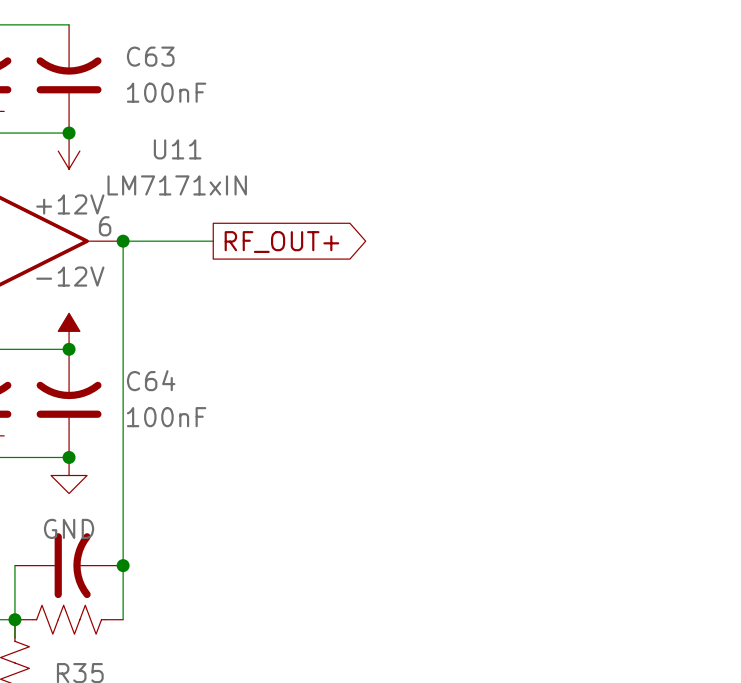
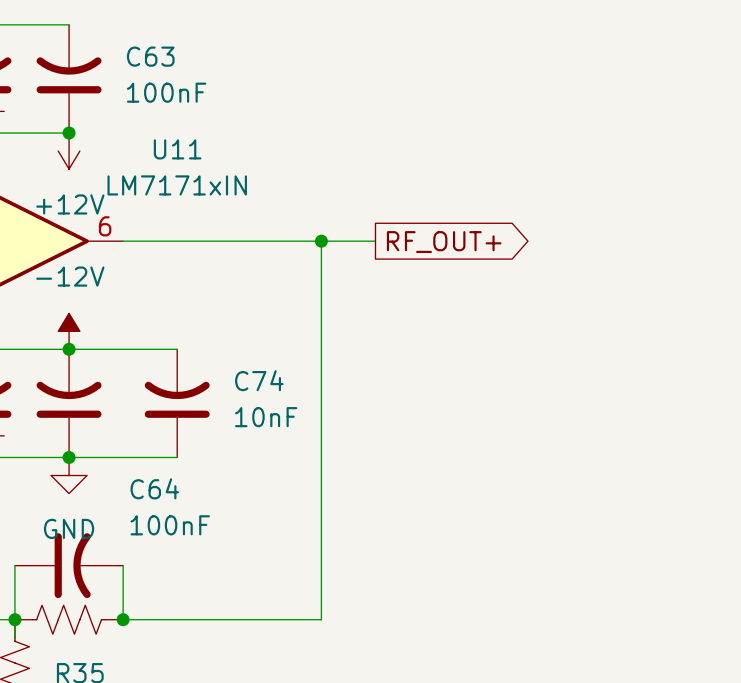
wire: (123, 241) (123, 565) -> none
junction: (123, 241) -> none
wire: none -> (213, 241) (375, 241)
wire: none -> (321, 241) (321, 619) (123, 619)
junction: none -> (321, 241)
global label position: RF_OUT+ (281, 242) -> RF_OUT+ (444, 242)
wire: none -> (69, 349) (177, 349)
C64 name position: C64 (151, 380) -> C64 (154, 488)
C74: none -> 10nF (177, 403)
C64 value position: 100nF (166, 417) -> 100nF (170, 525)
wire: none -> (69, 457) (177, 457)
junction position: (123, 565) -> (123, 619)

